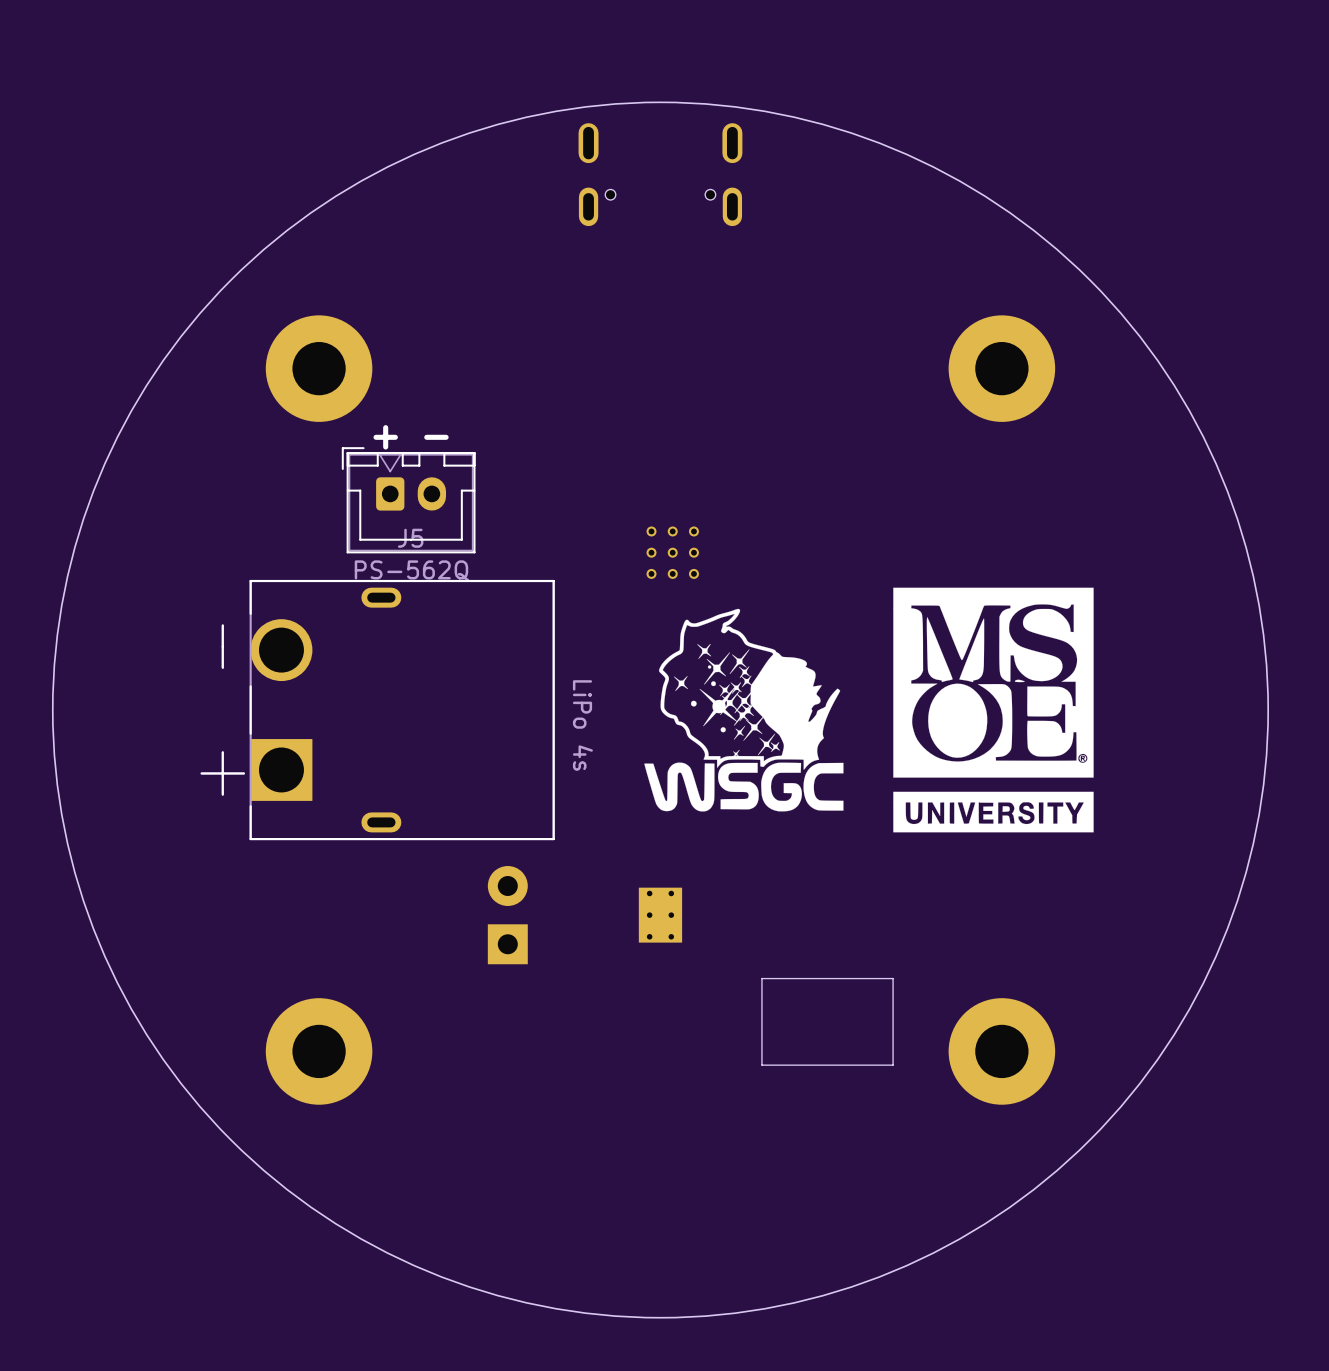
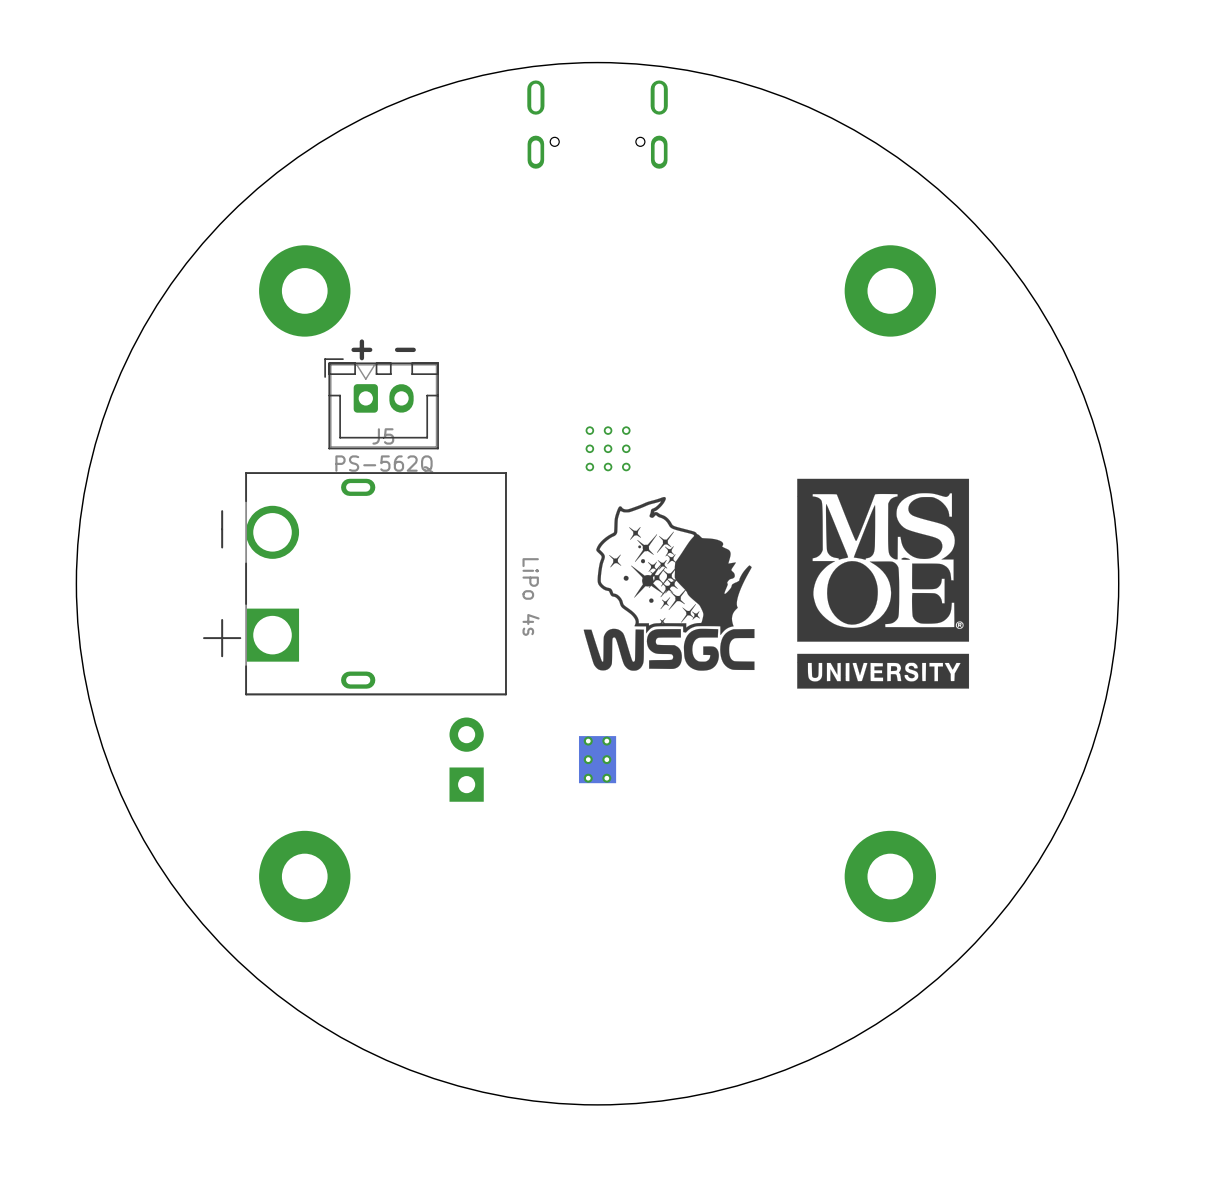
board edge: (893, 978) (761, 978) (761, 1065) (893, 1065) (893, 978) -> none

